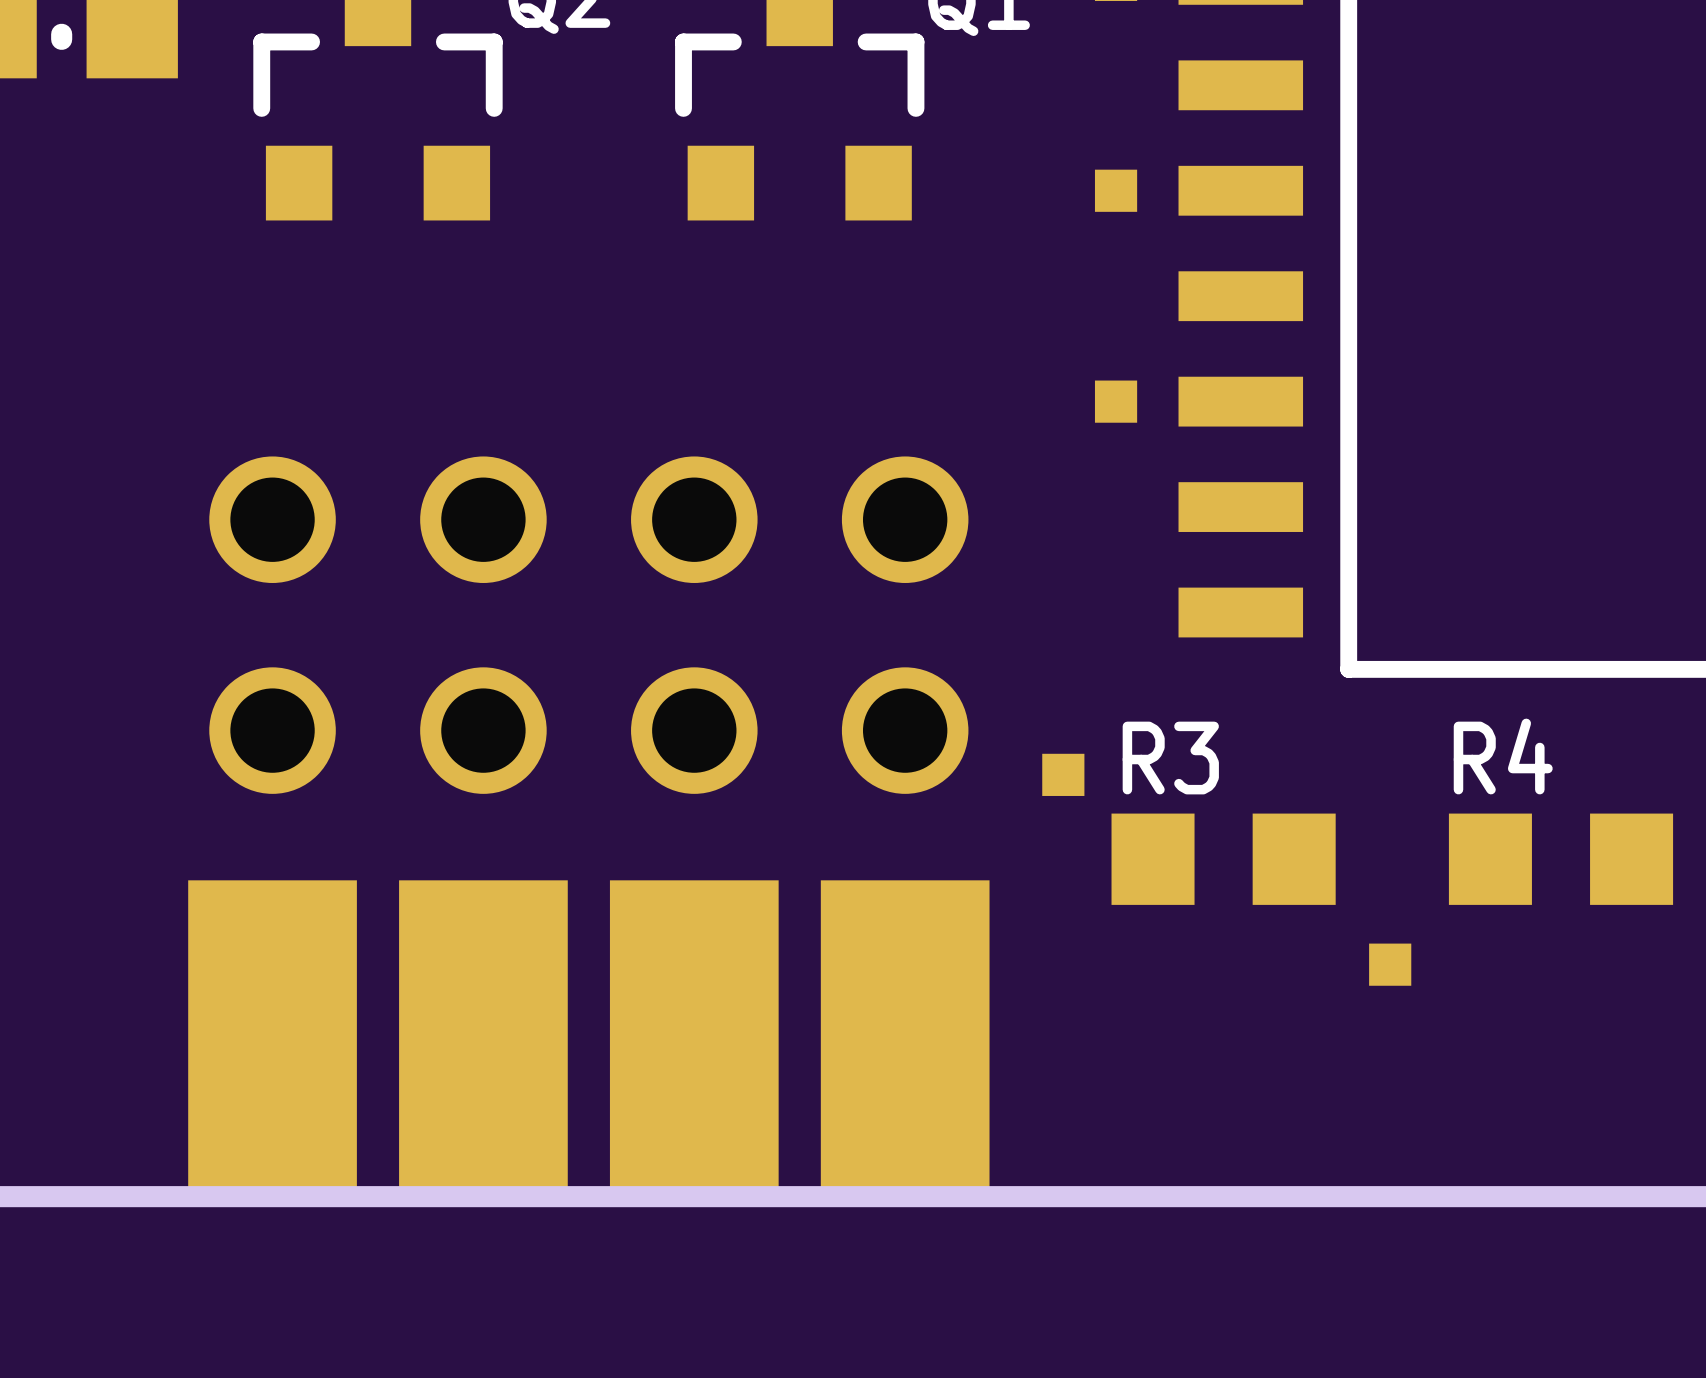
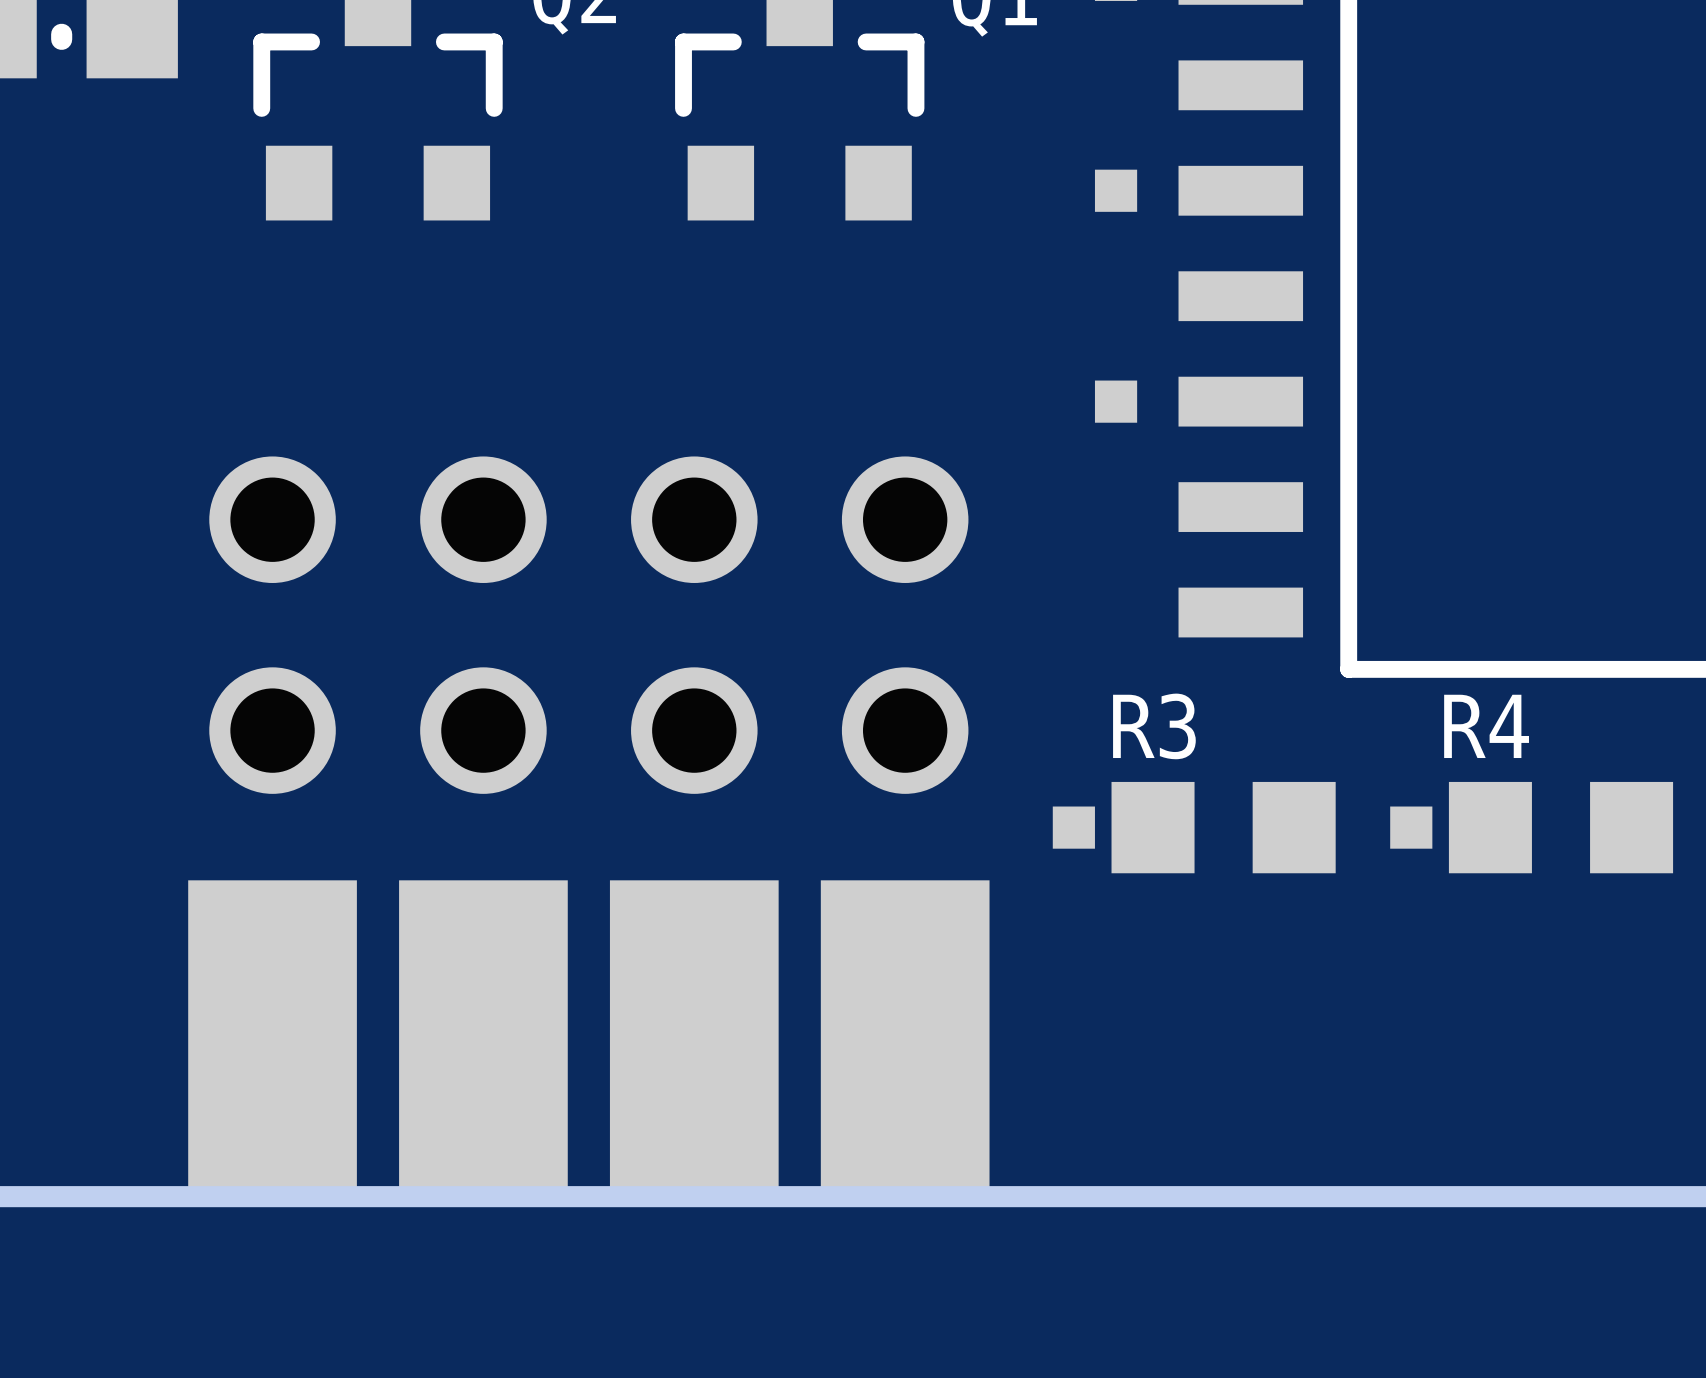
part position: (1063, 774) -> (1073, 827)
R3 position: (1223, 859) -> (1223, 827)
R4 position: (1561, 859) -> (1561, 827)
part position: (1390, 964) -> (1411, 827)

